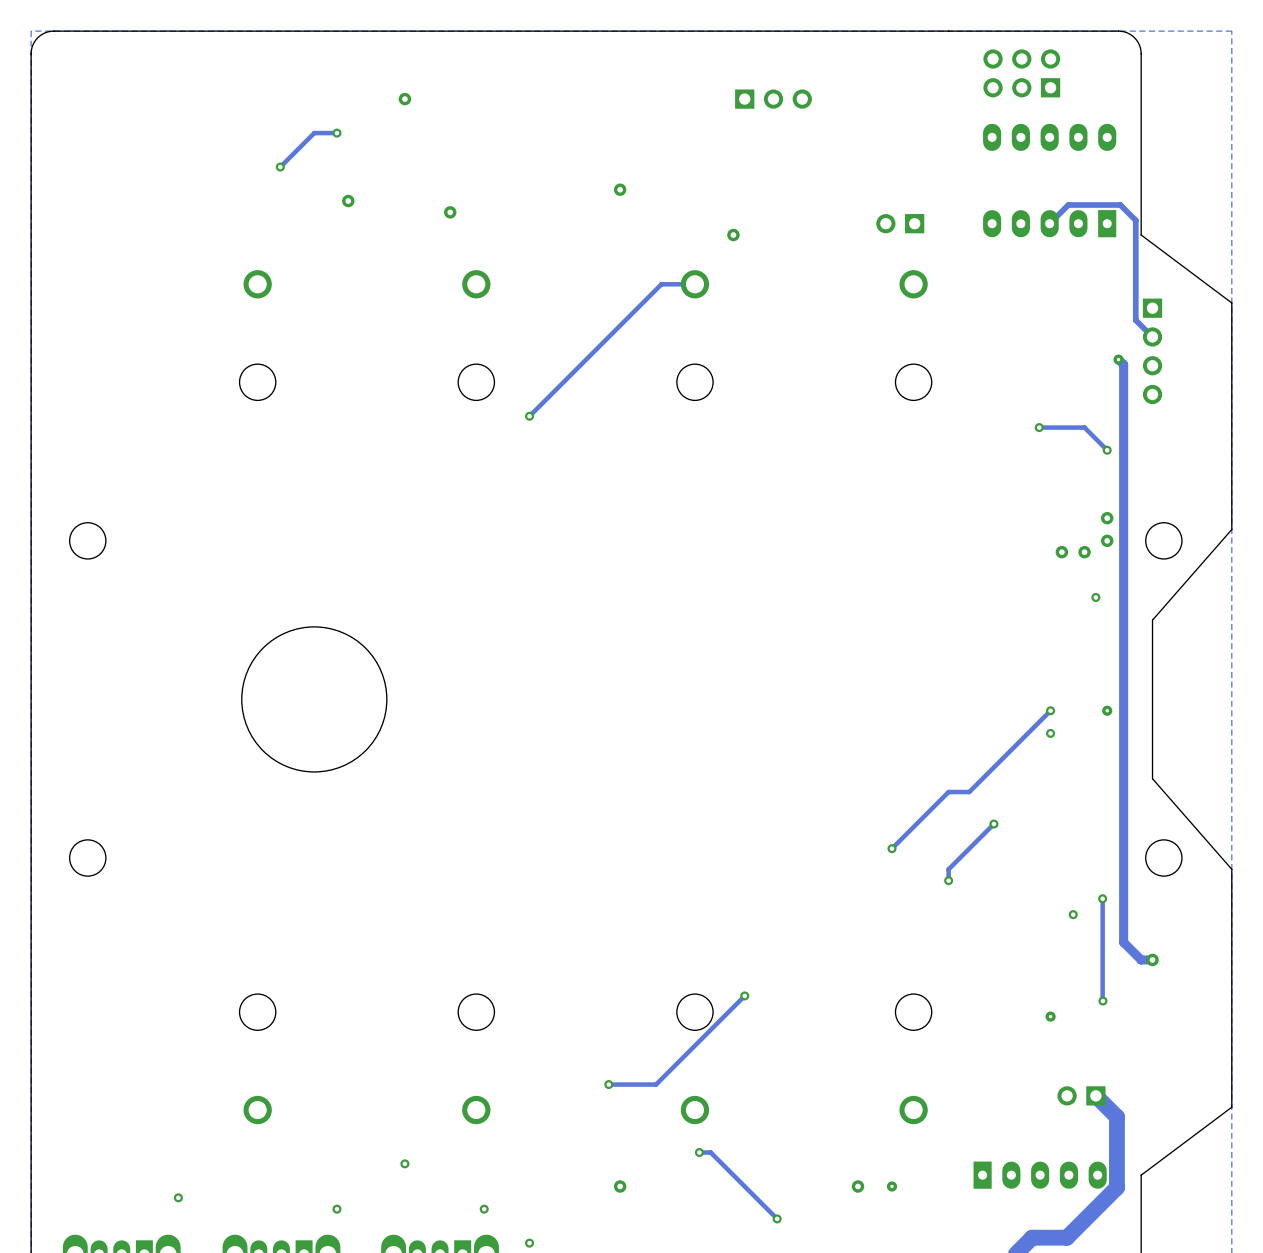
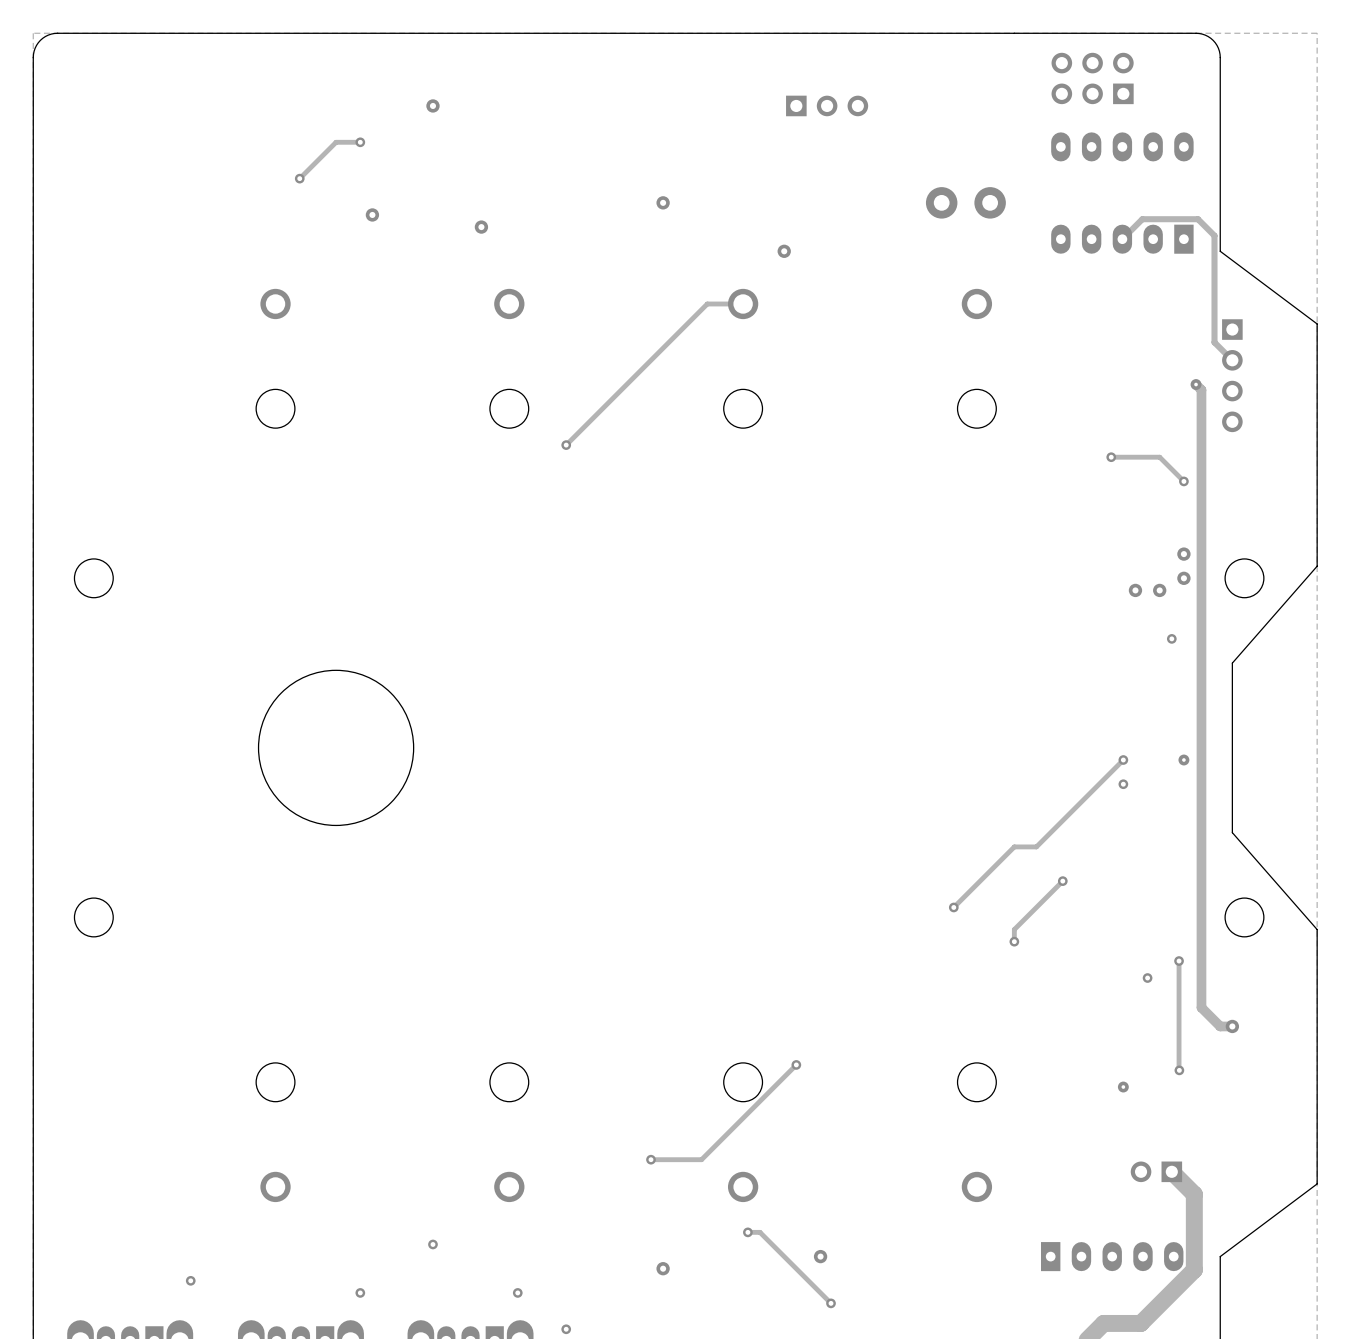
part: none -> (941, 202)
part: none -> (990, 202)
part: (900, 223) -> none
via: none -> (820, 1256)
via: (858, 1186) -> none
via: (891, 1186) -> none

